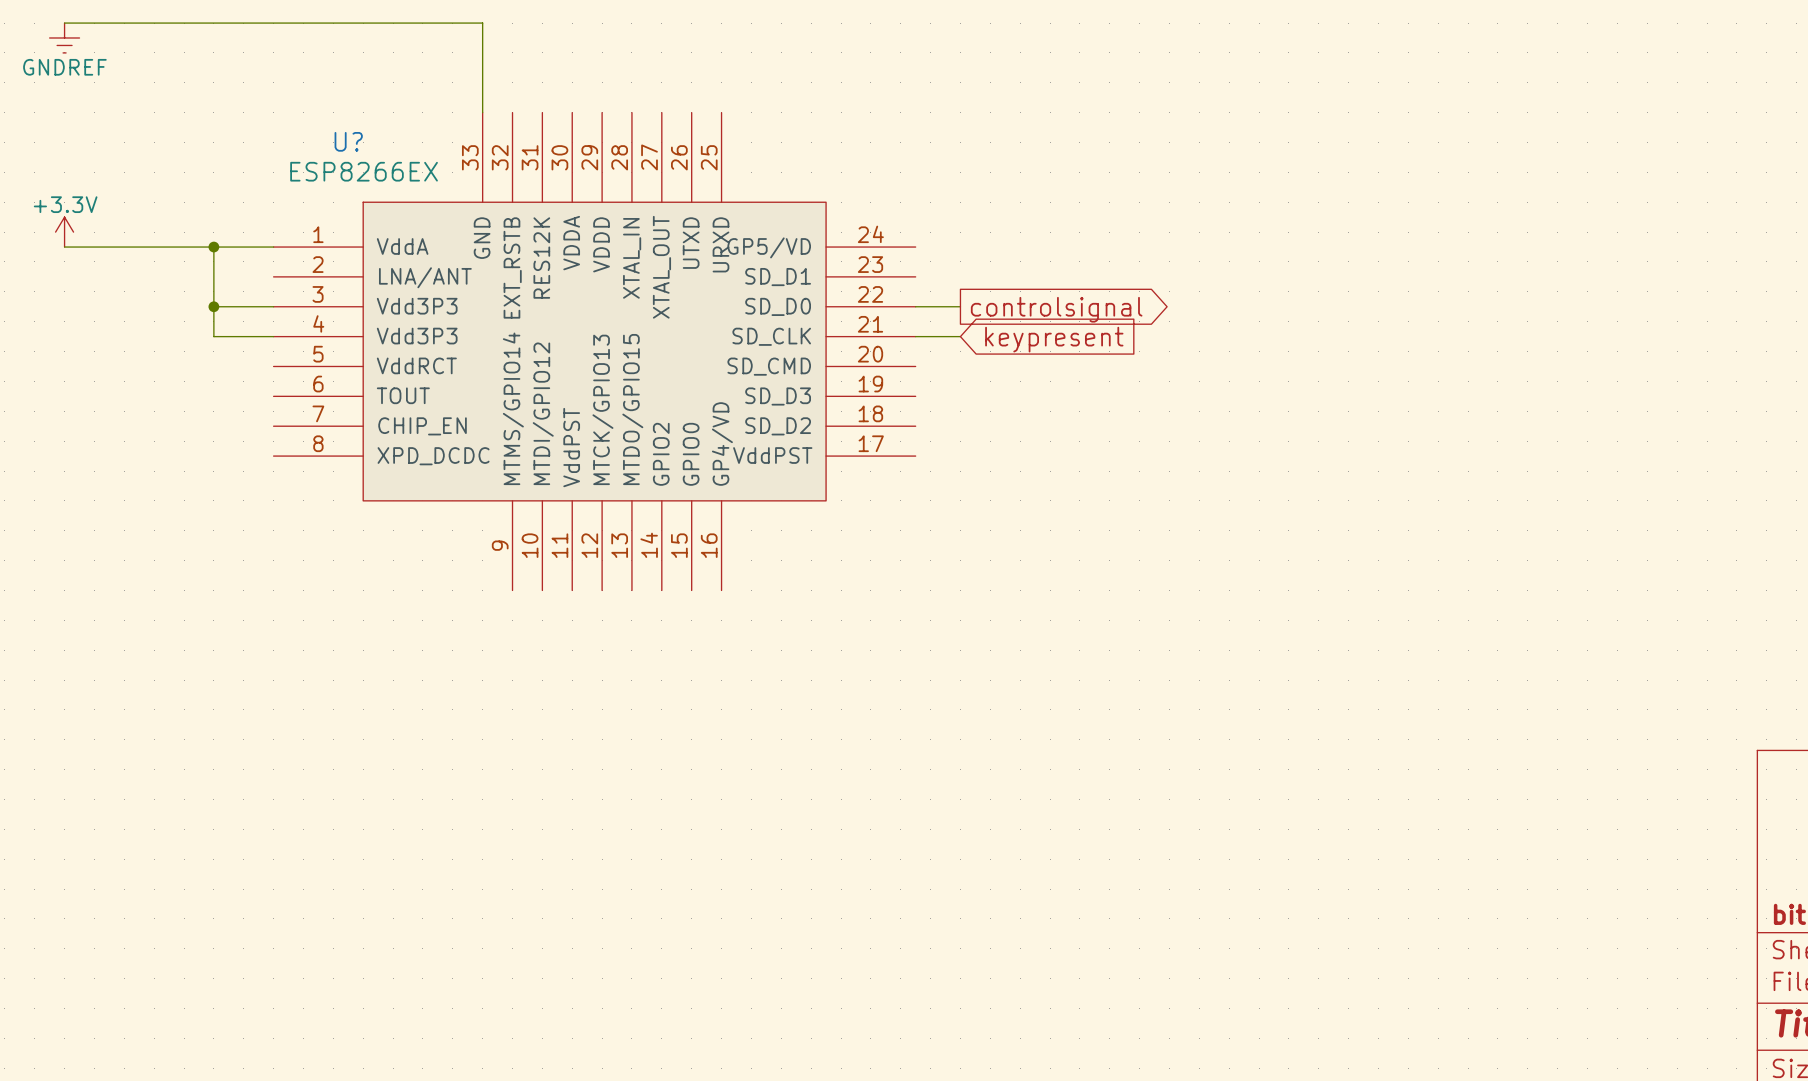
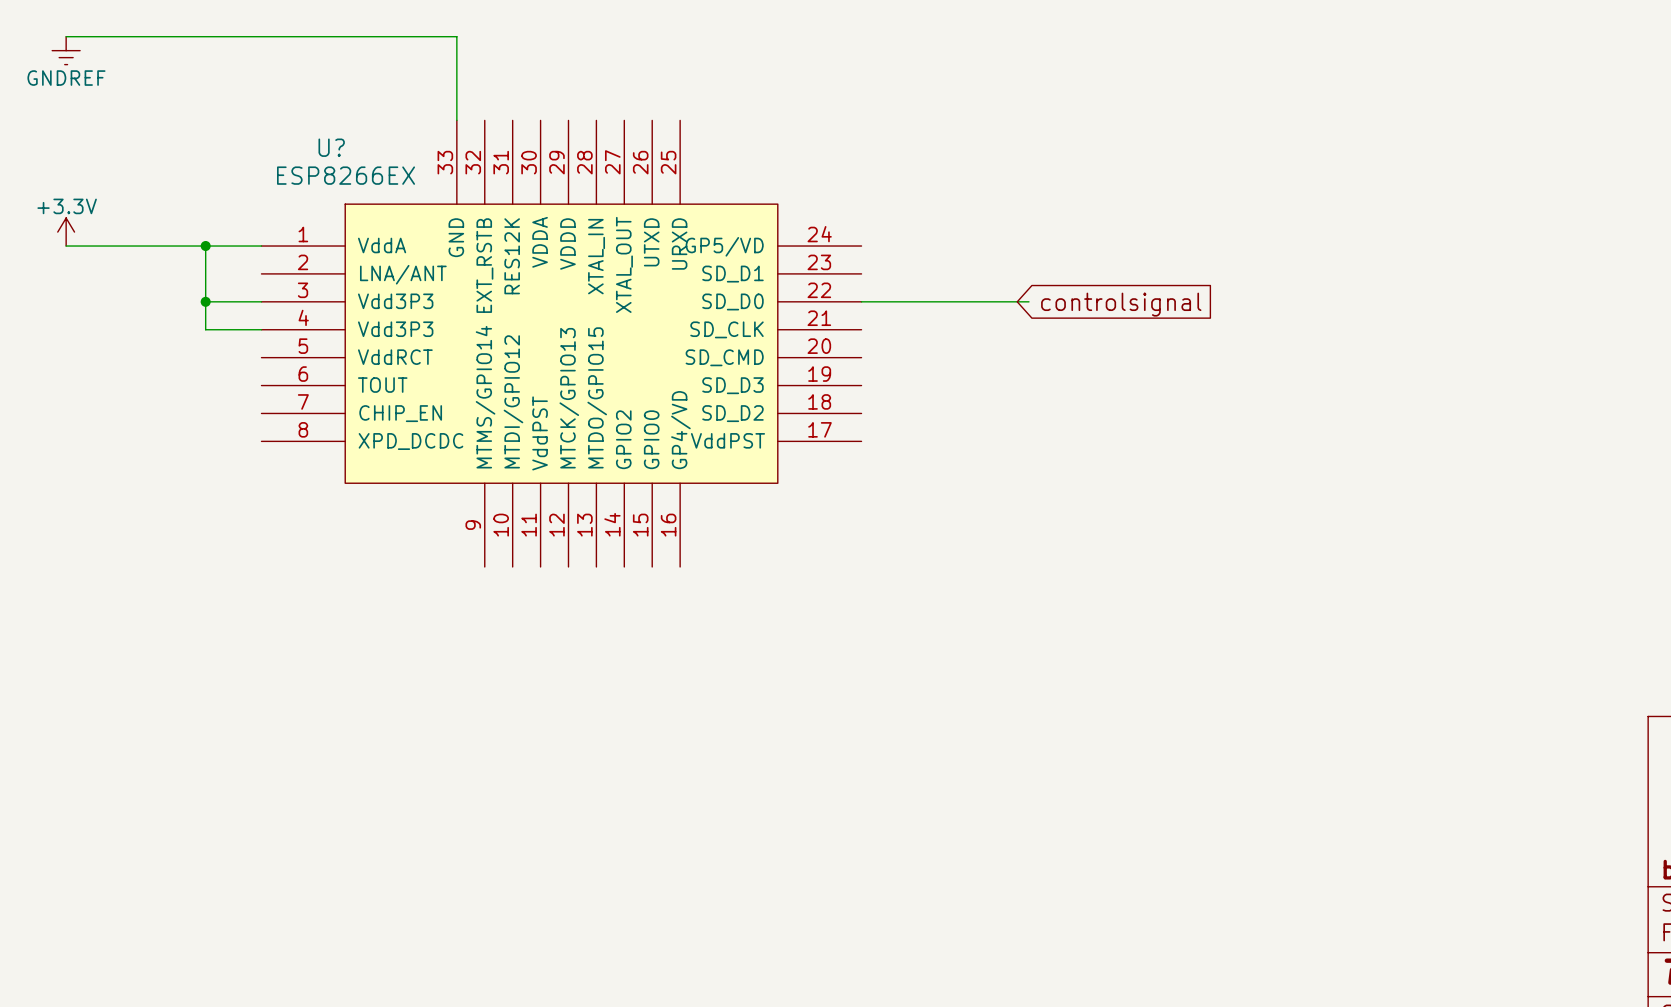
wire: none -> (903, 301) (1028, 301)
global label: controlsignal (1056, 309) -> none
global label: none -> controlsignal (1121, 304)
wire: (915, 336) (960, 336) -> none
global label: keypresent (1054, 339) -> none

